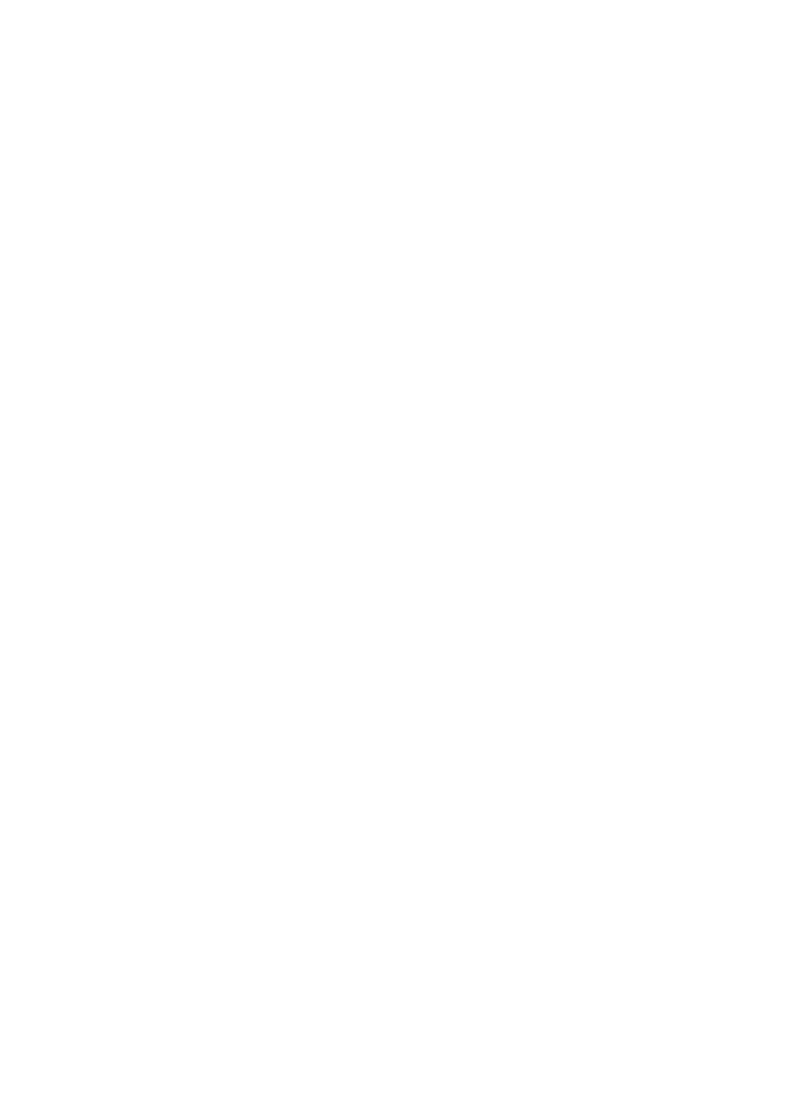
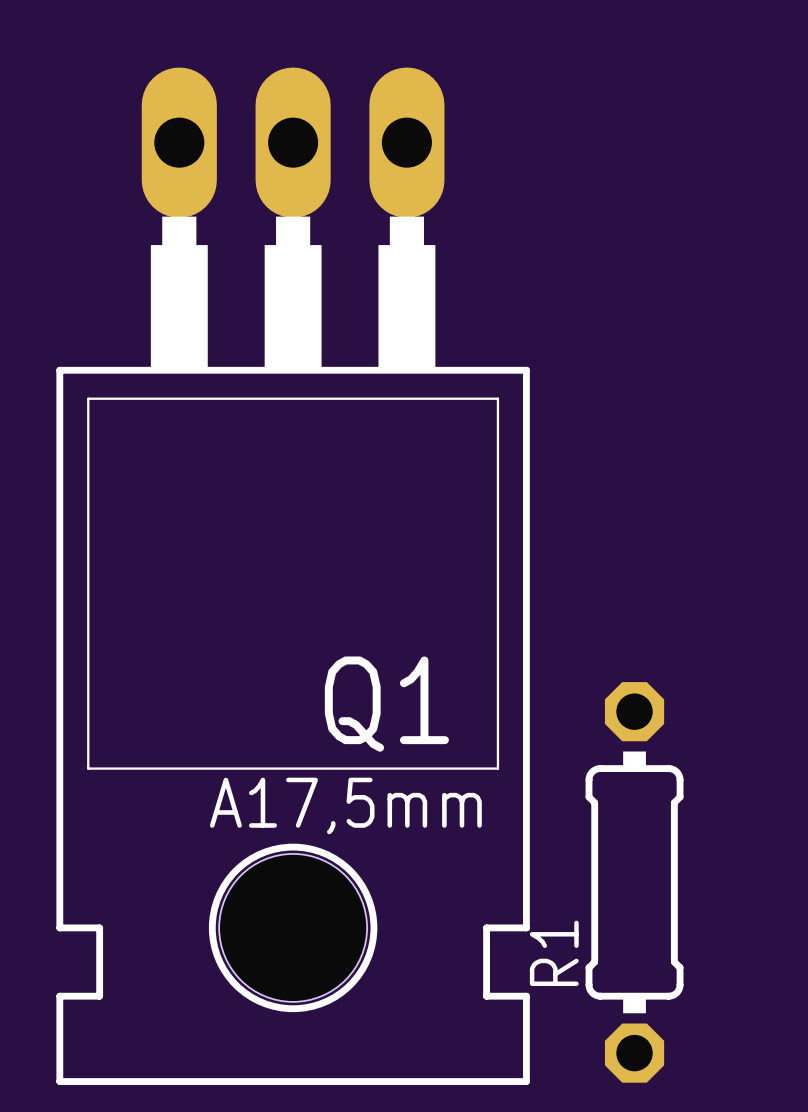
Q1: none -> (293, 576)
R1: none -> (634, 882)

